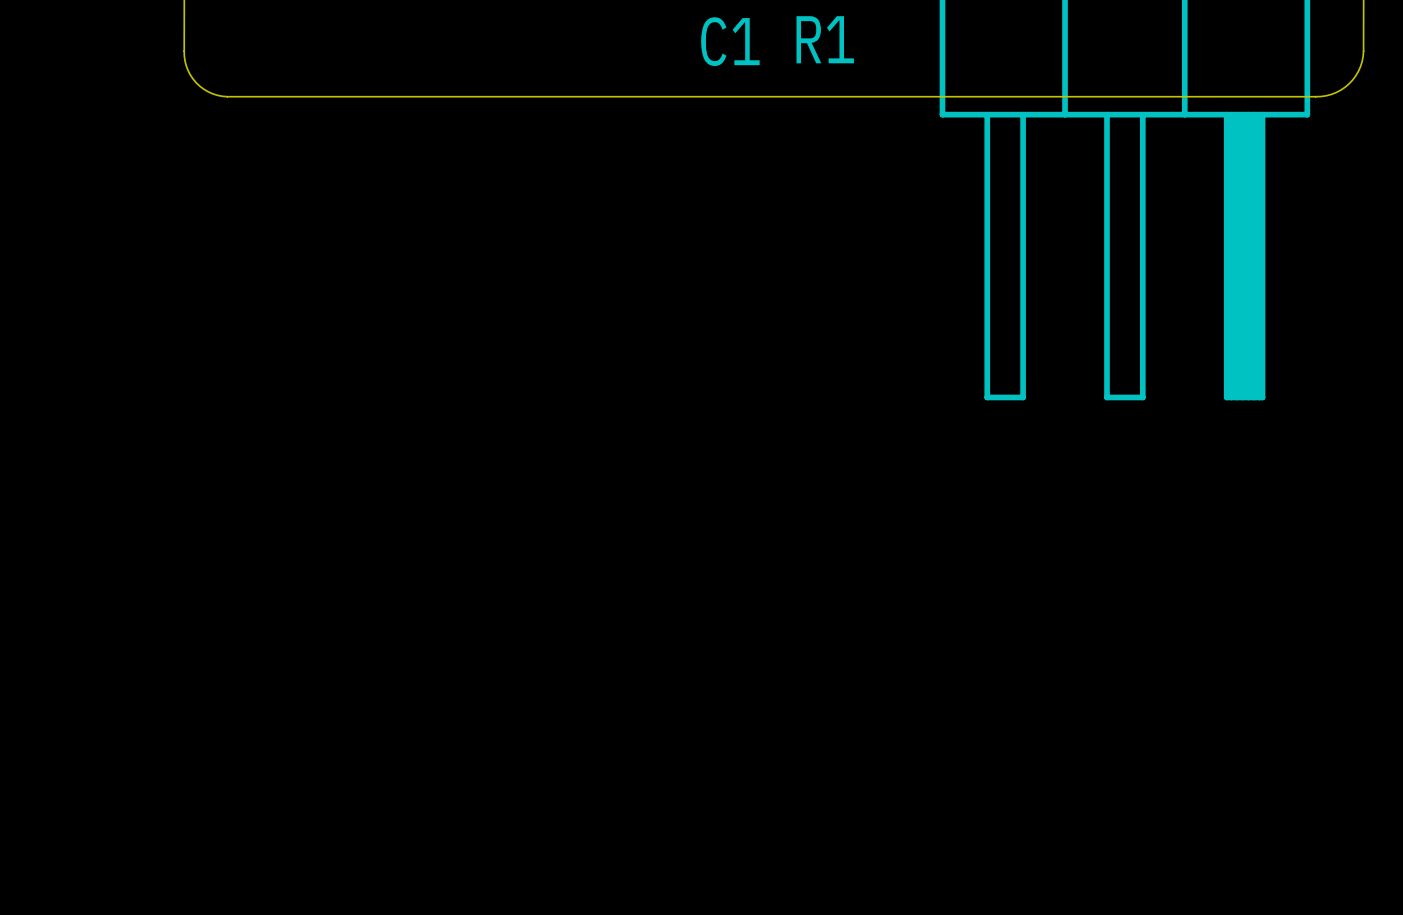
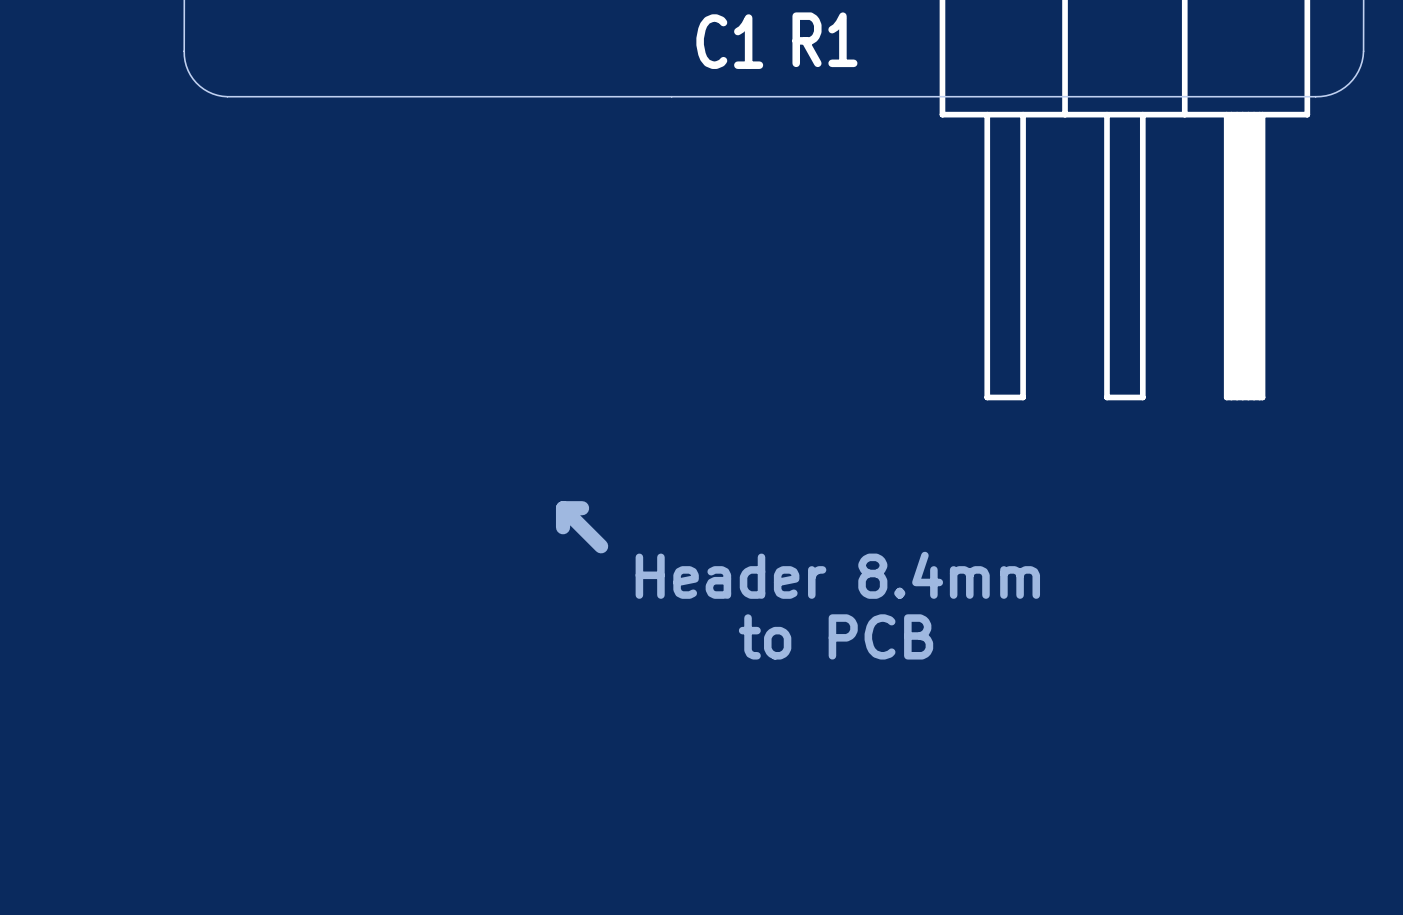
text: none -> → (582, 527)
text: none -> Header 8.4mm (837, 575)
text: none -> to PCB (836, 636)

